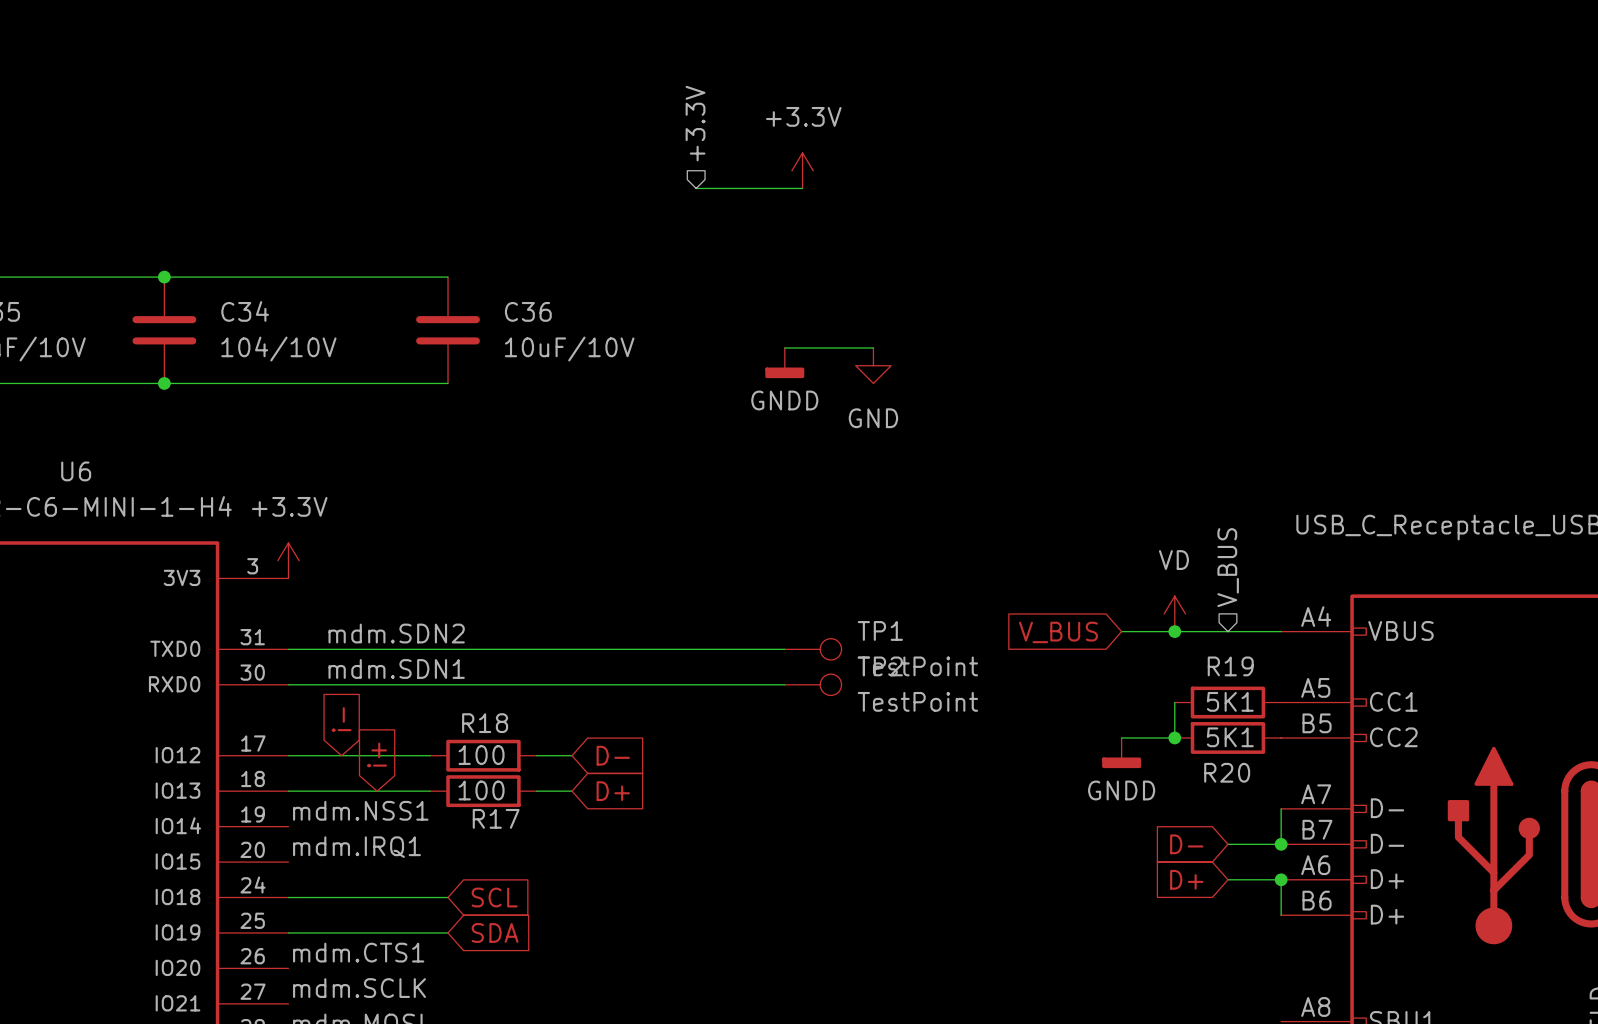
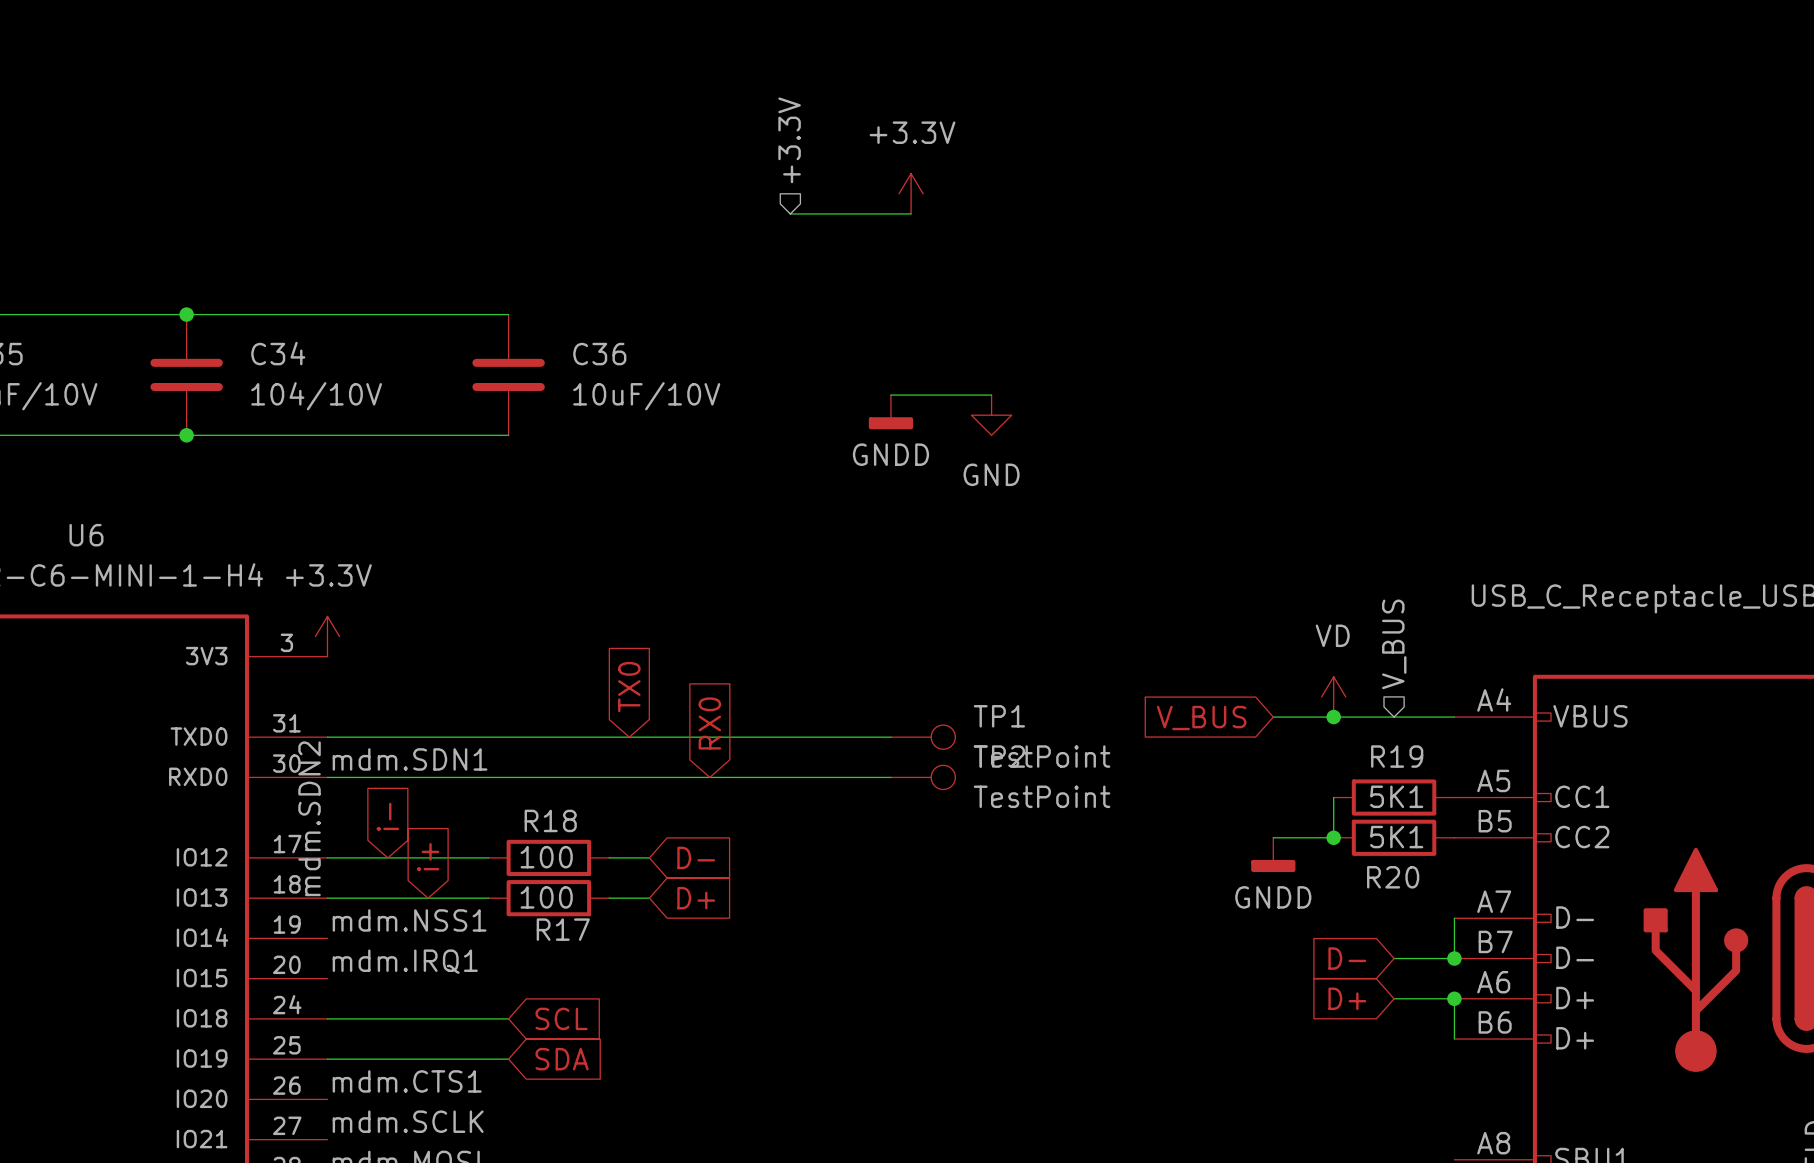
global label: none -> TX0 (629, 687)
label rotation: 0° (396, 633) -> 90° counterclockwise (309, 818)
global label: none -> RX0 (709, 723)
label position: mdm.SDN1 (396, 668) -> mdm.SDN1 (410, 759)

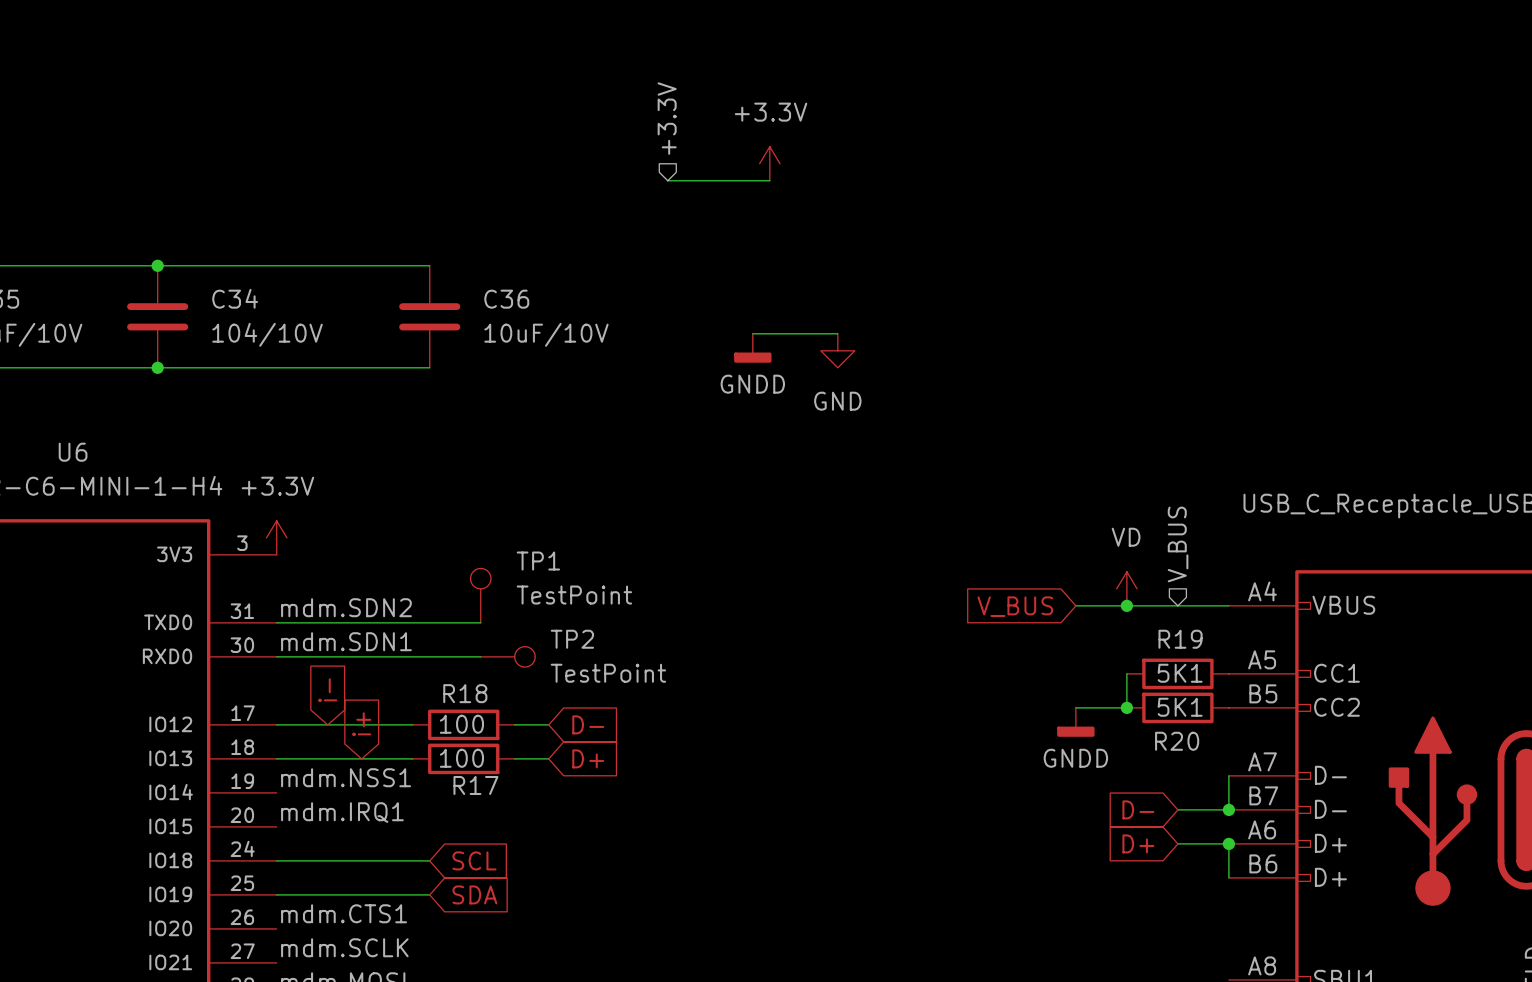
global label: TX0 (629, 687) -> none
global label: RX0 (709, 723) -> none
wire: (568, 737) (890, 737) -> none
TP1 position: (923, 737) -> (480, 595)
TP1 rotation: 0° (943, 737) -> 90° counterclockwise (480, 578)
wire: (568, 777) (890, 777) -> none
TP2 position: (923, 777) -> (507, 656)
label rotation: 0° (309, 818) -> 90° clockwise (346, 607)

